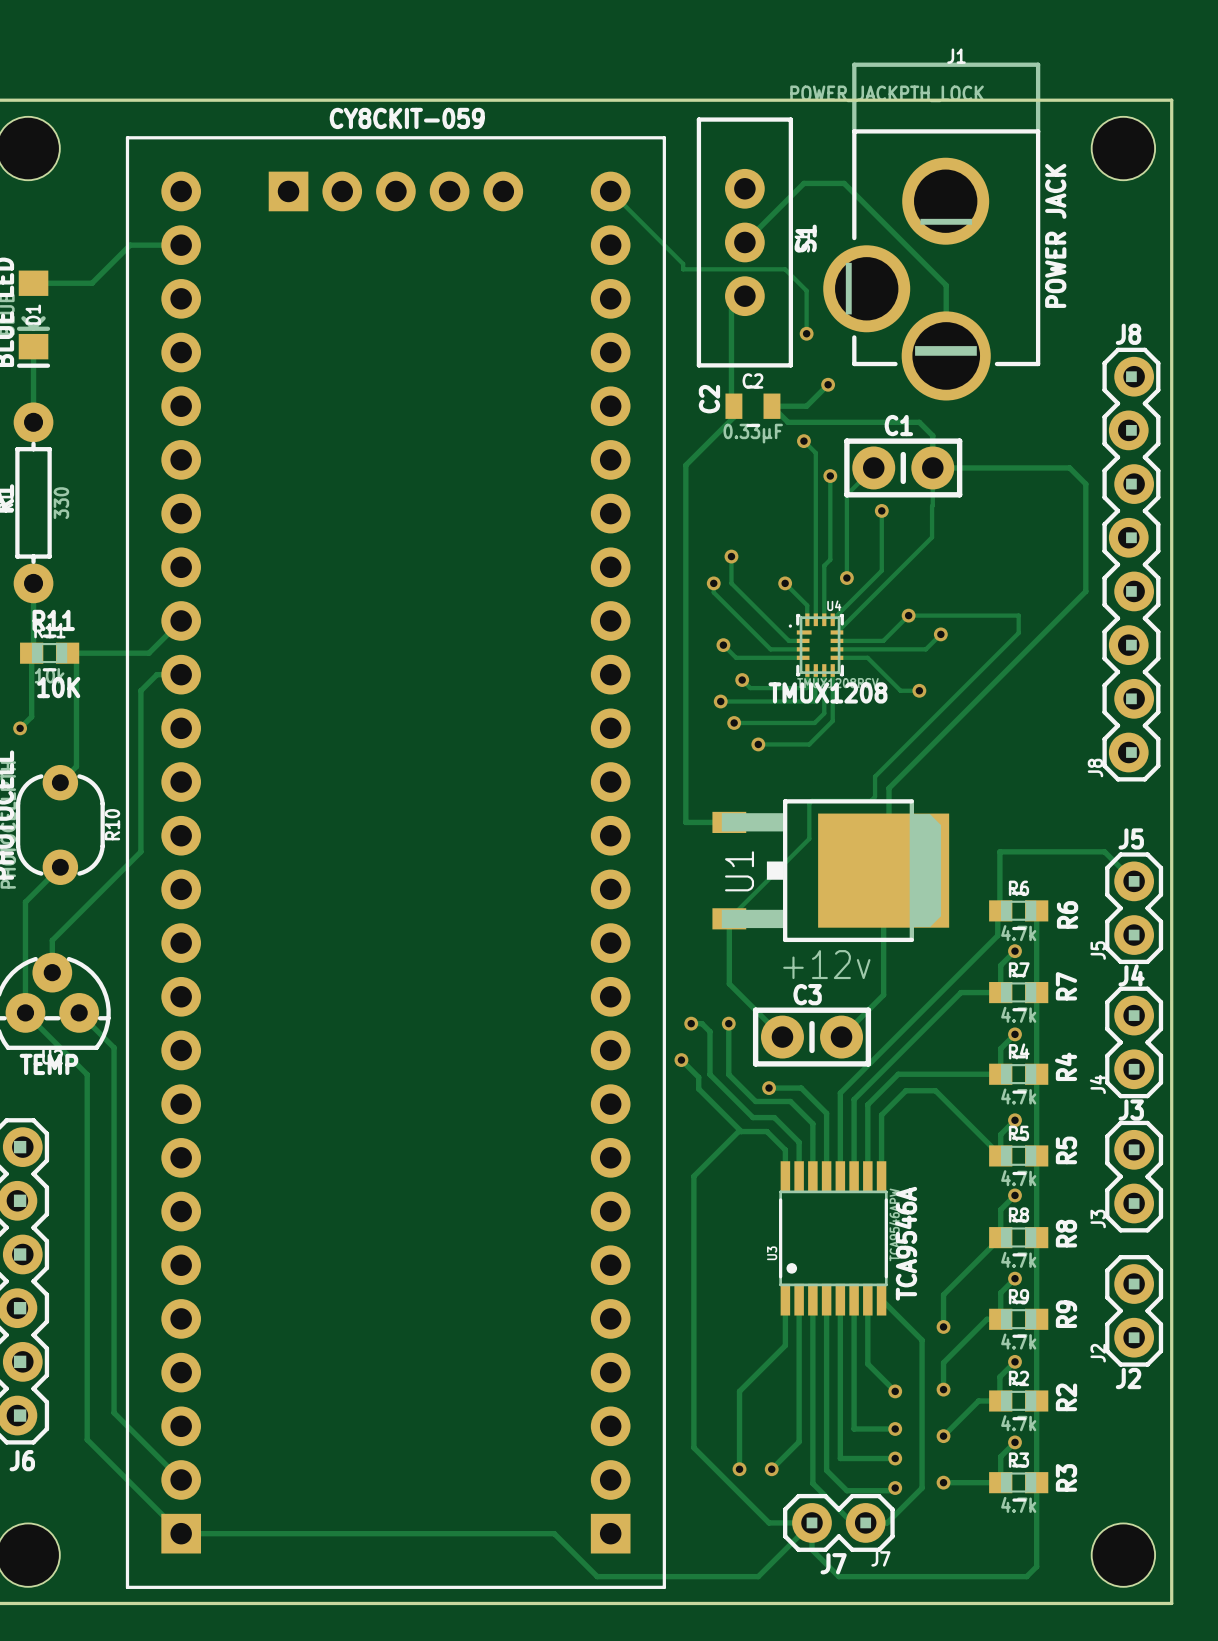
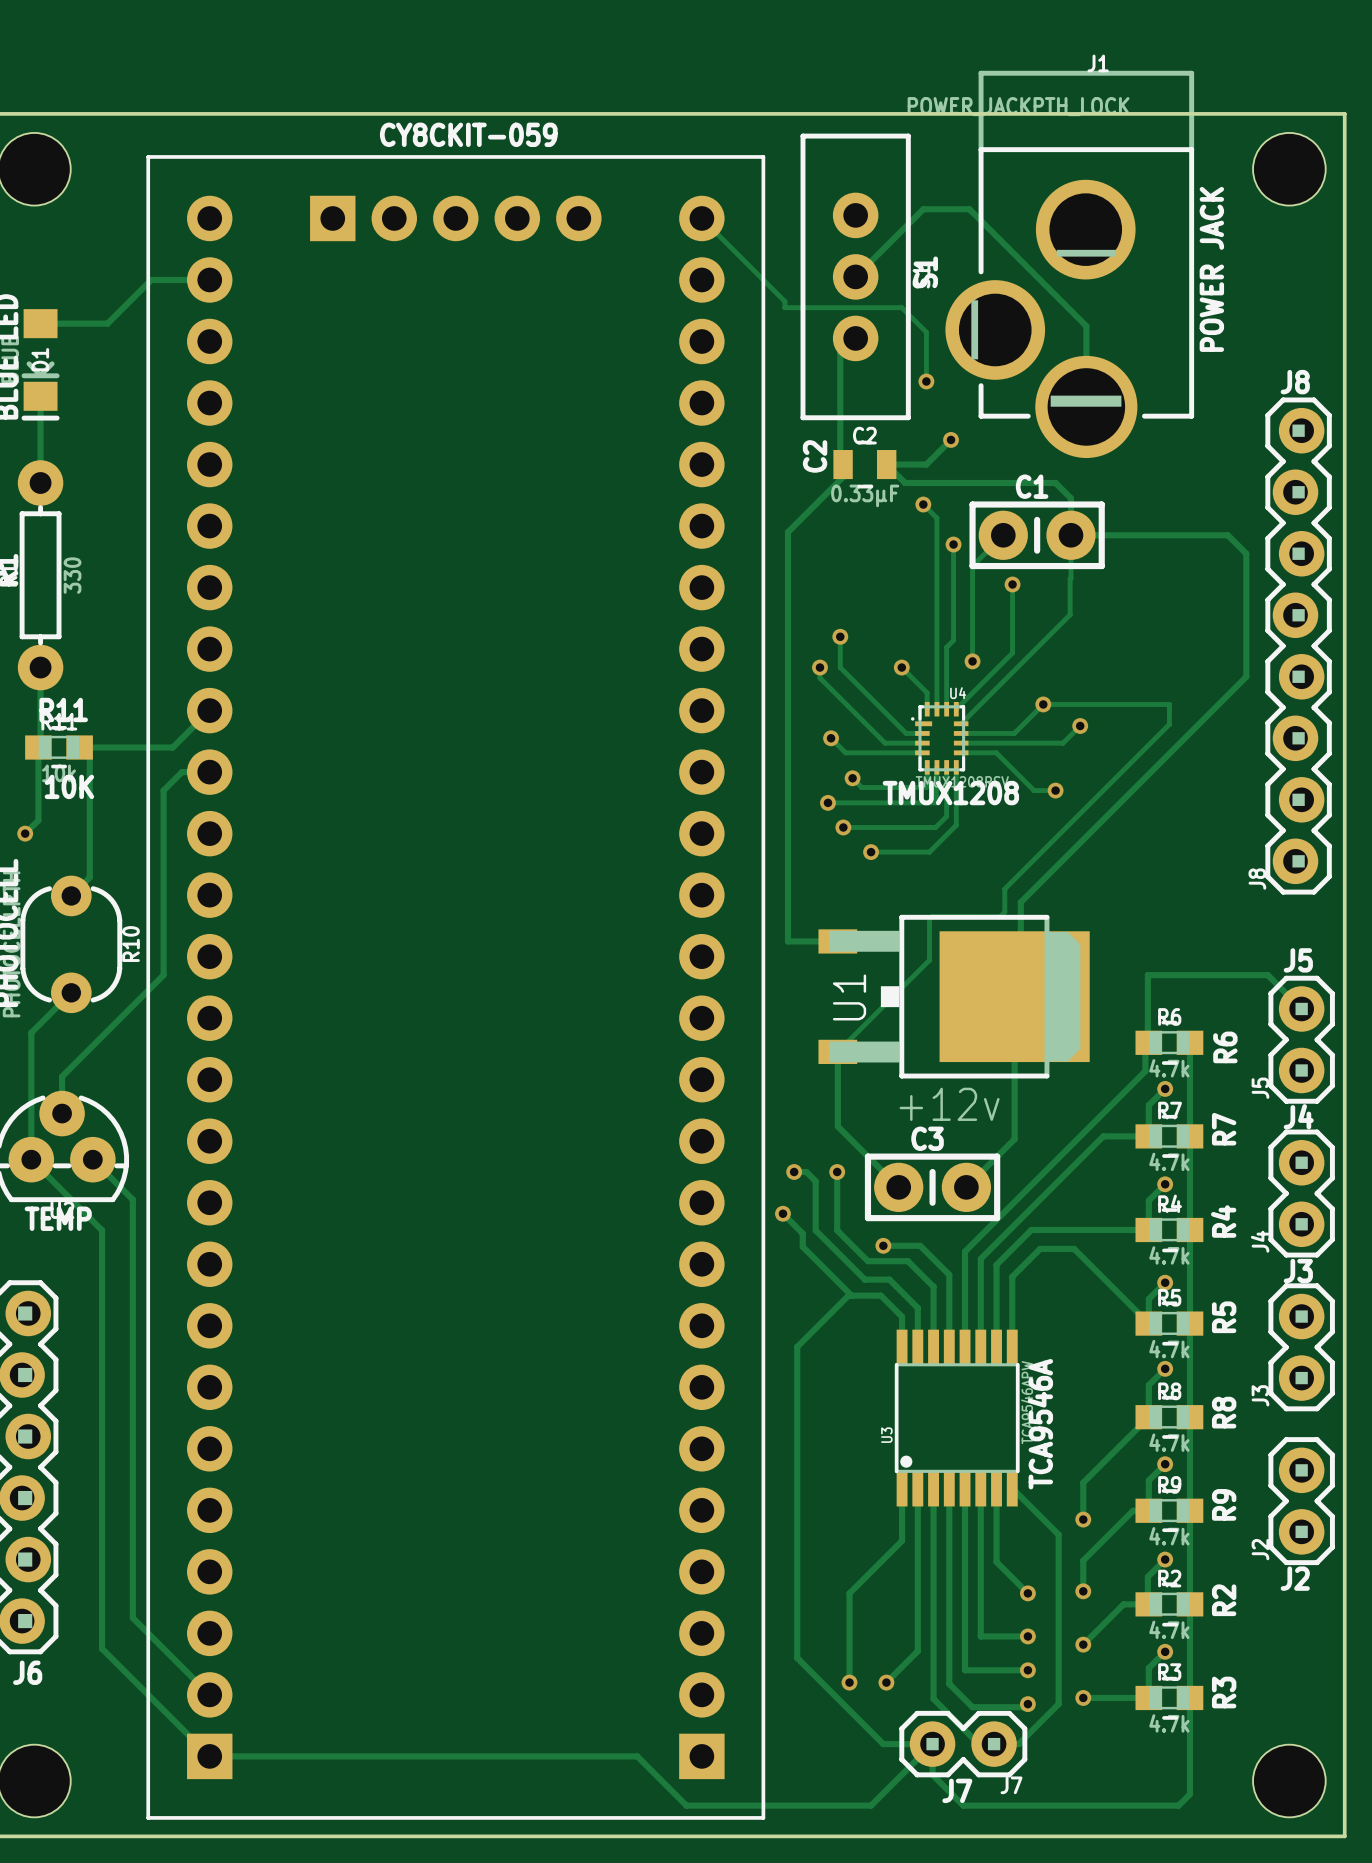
U4 footprint: [788, 613, 844, 677] -> [911, 701, 969, 775]
U3 footprint: [779, 1161, 888, 1316] -> [894, 1329, 1020, 1507]

